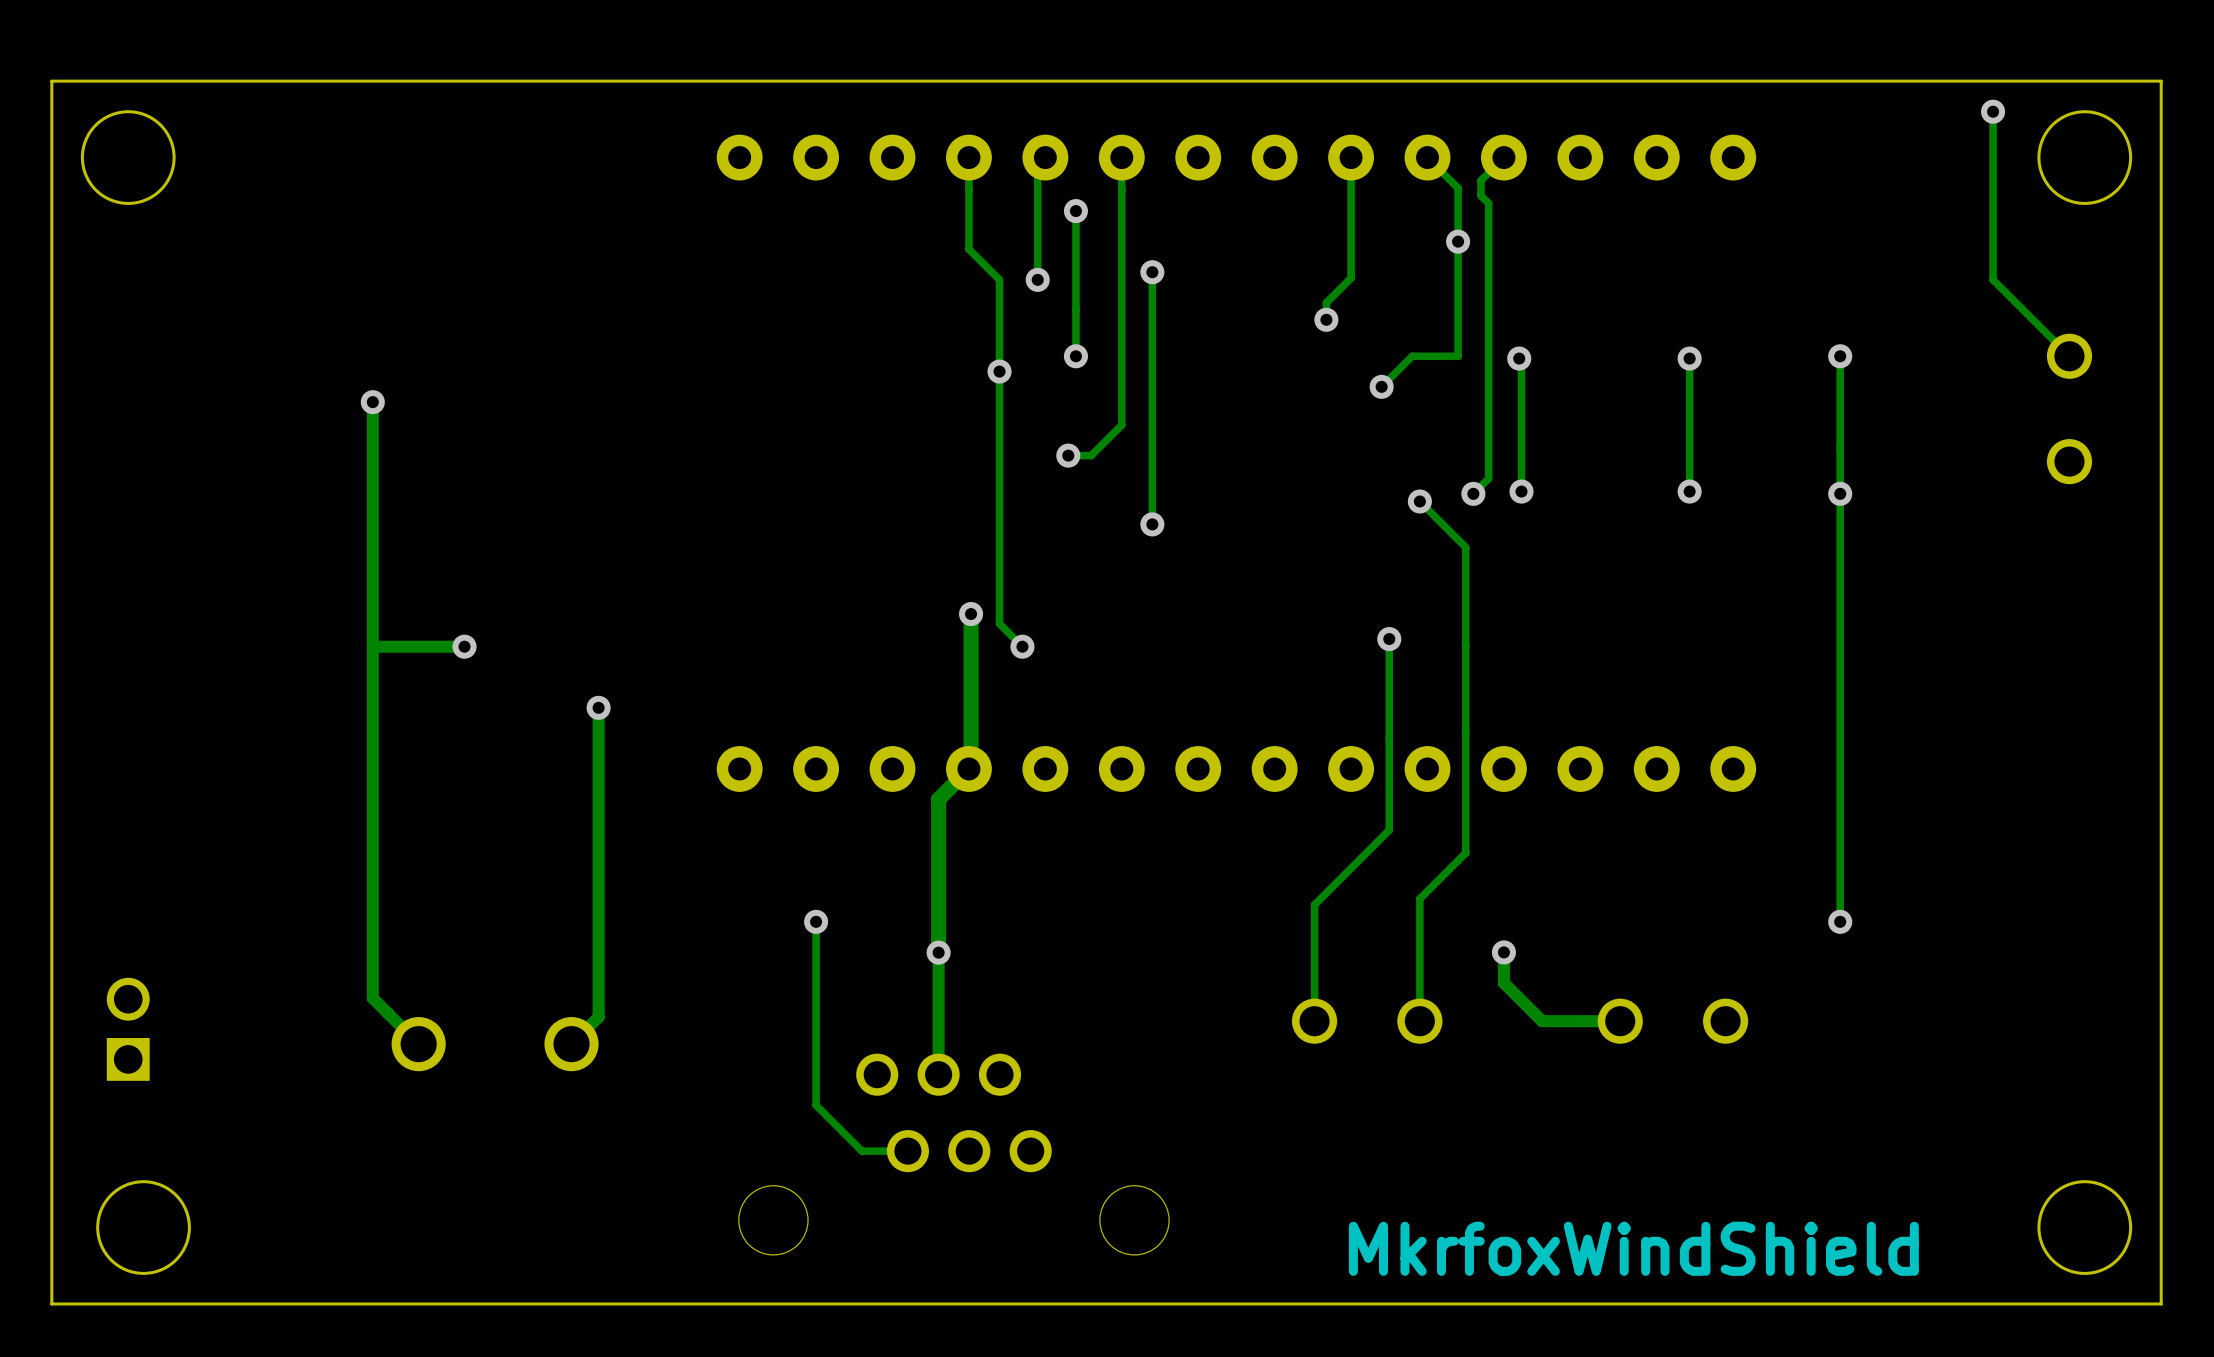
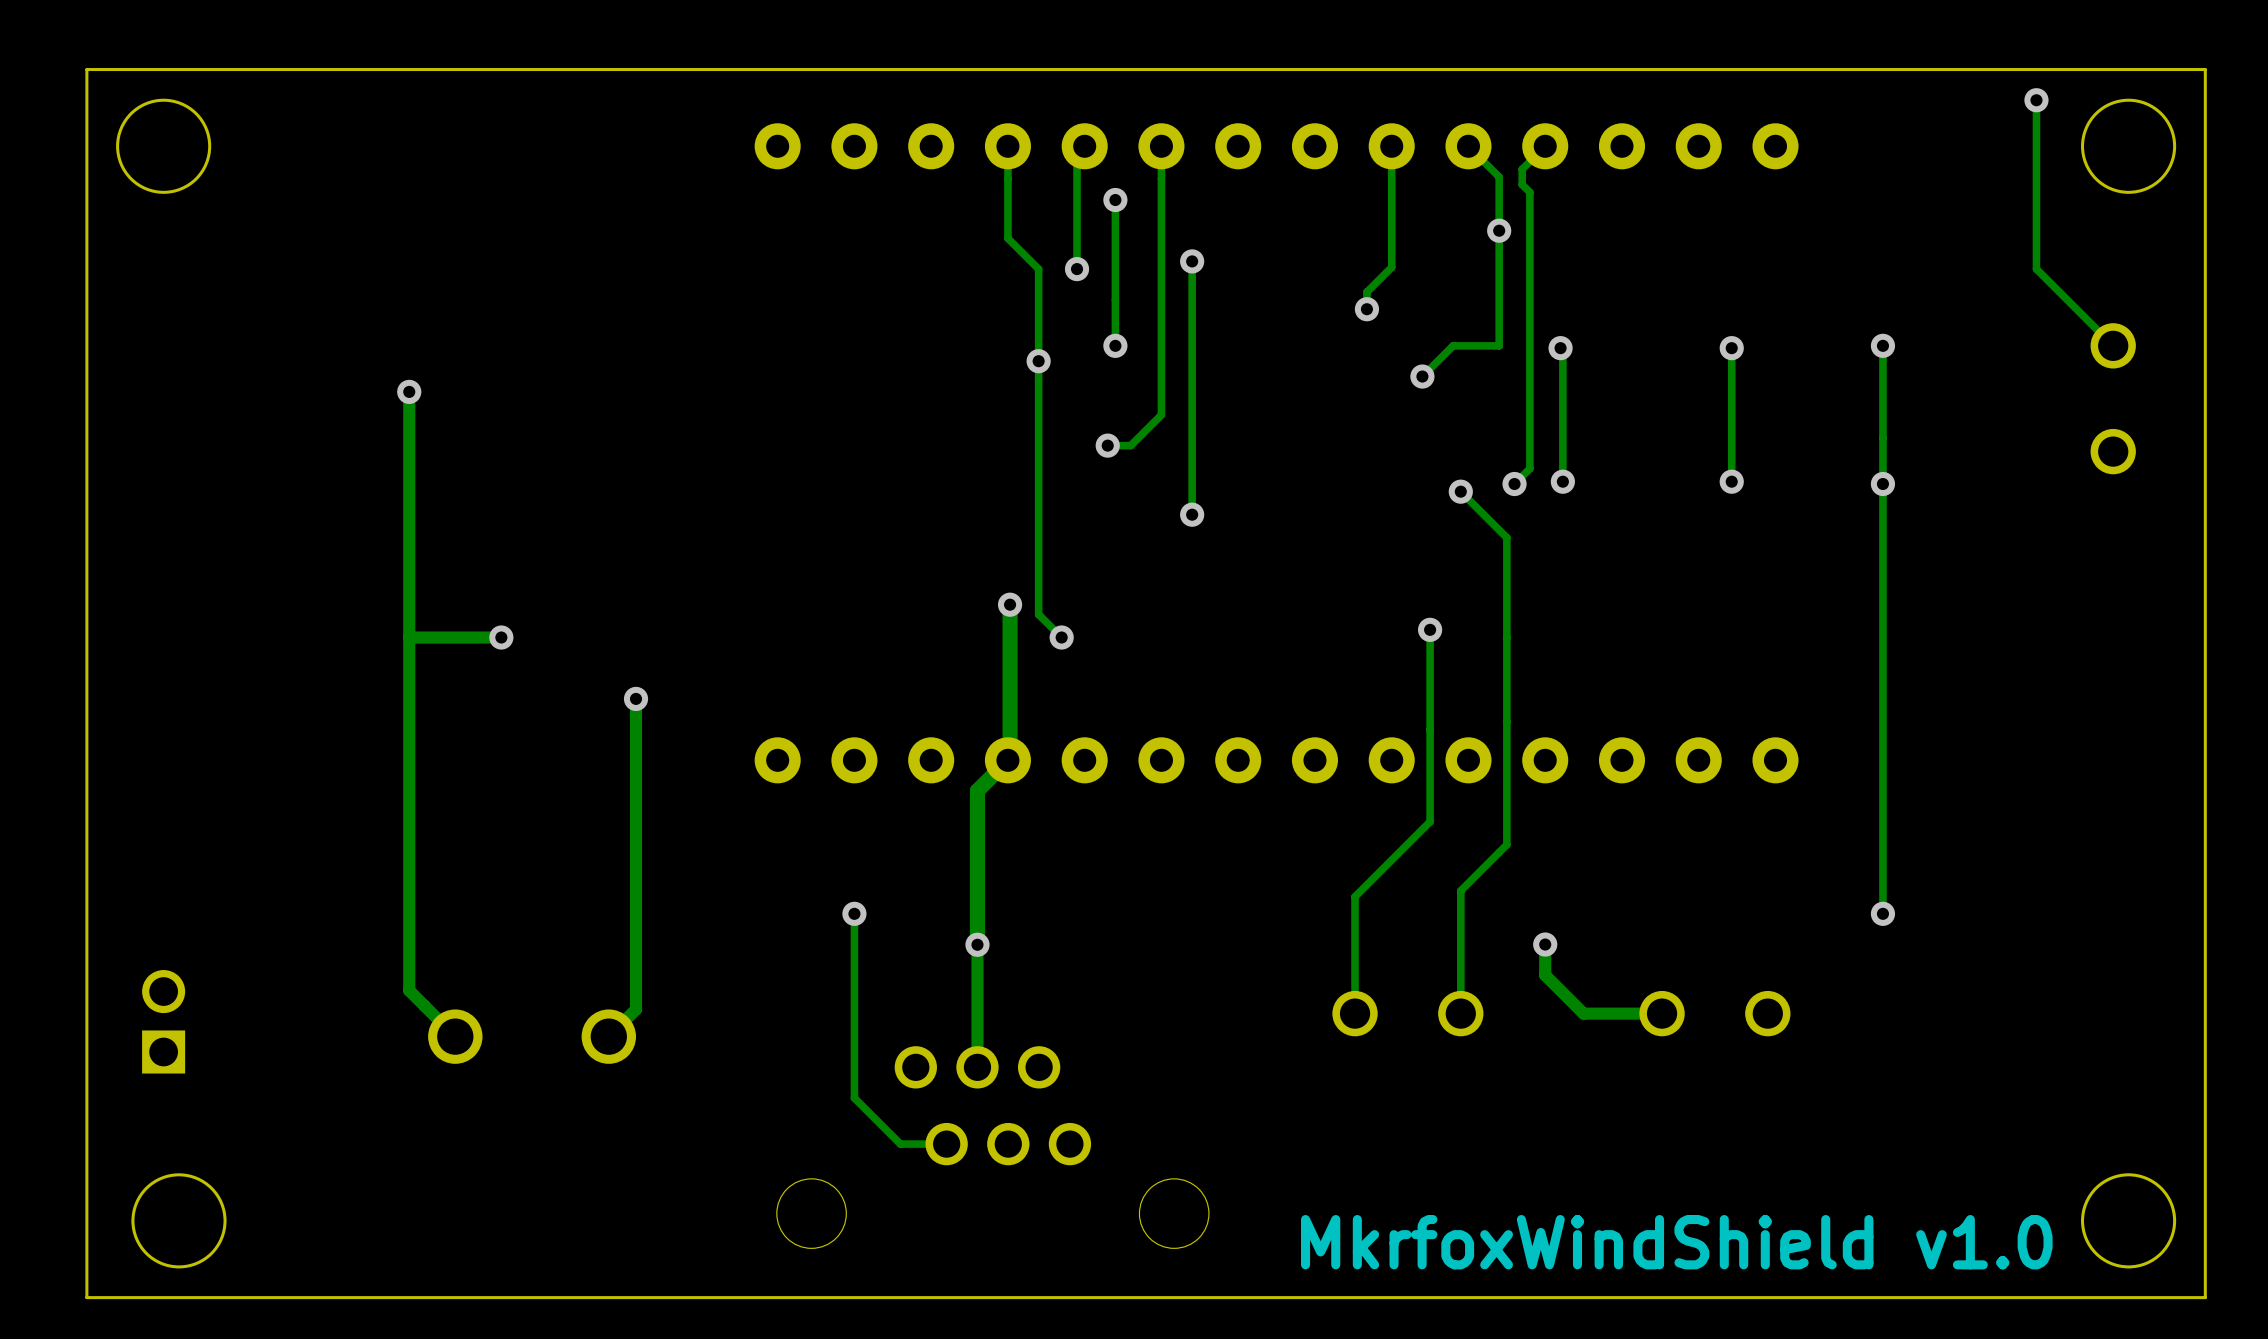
text: MkrfoxWindShield (1633, 1248) -> MkrfoxWindShield v1.0 (1676, 1242)

